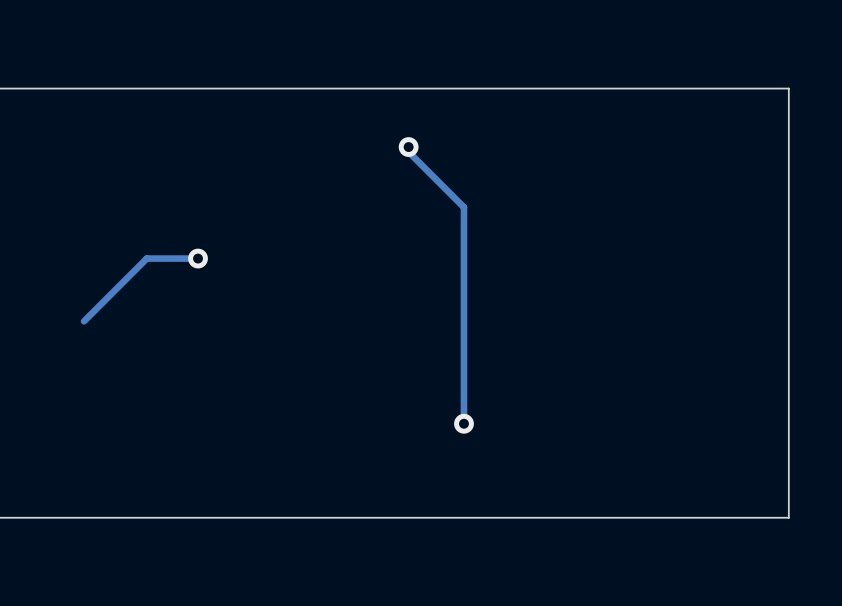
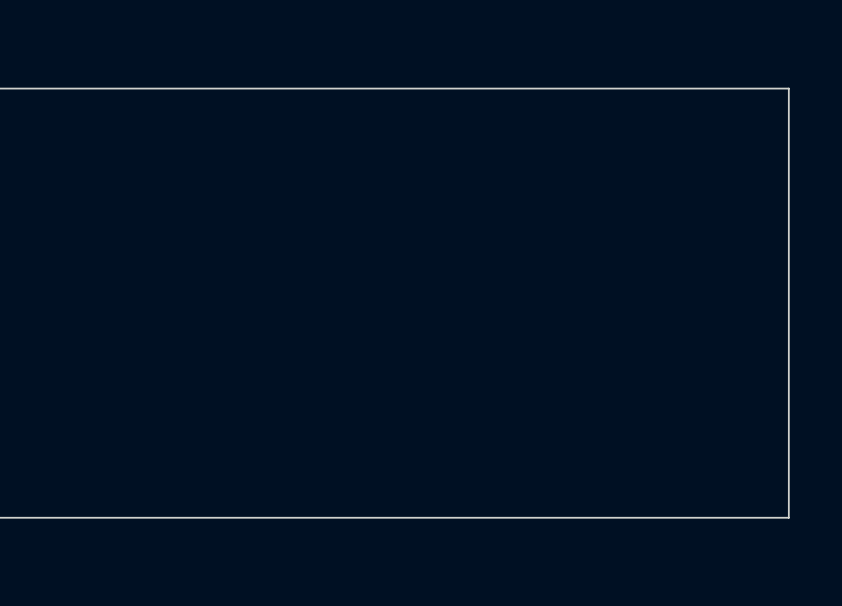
track: (408, 147) (408, 152) (463, 207) (463, 423) -> none
via: (408, 147) -> none
track: (198, 258) (146, 258) (84, 321) -> none
via: (198, 258) -> none
via: (463, 423) -> none

